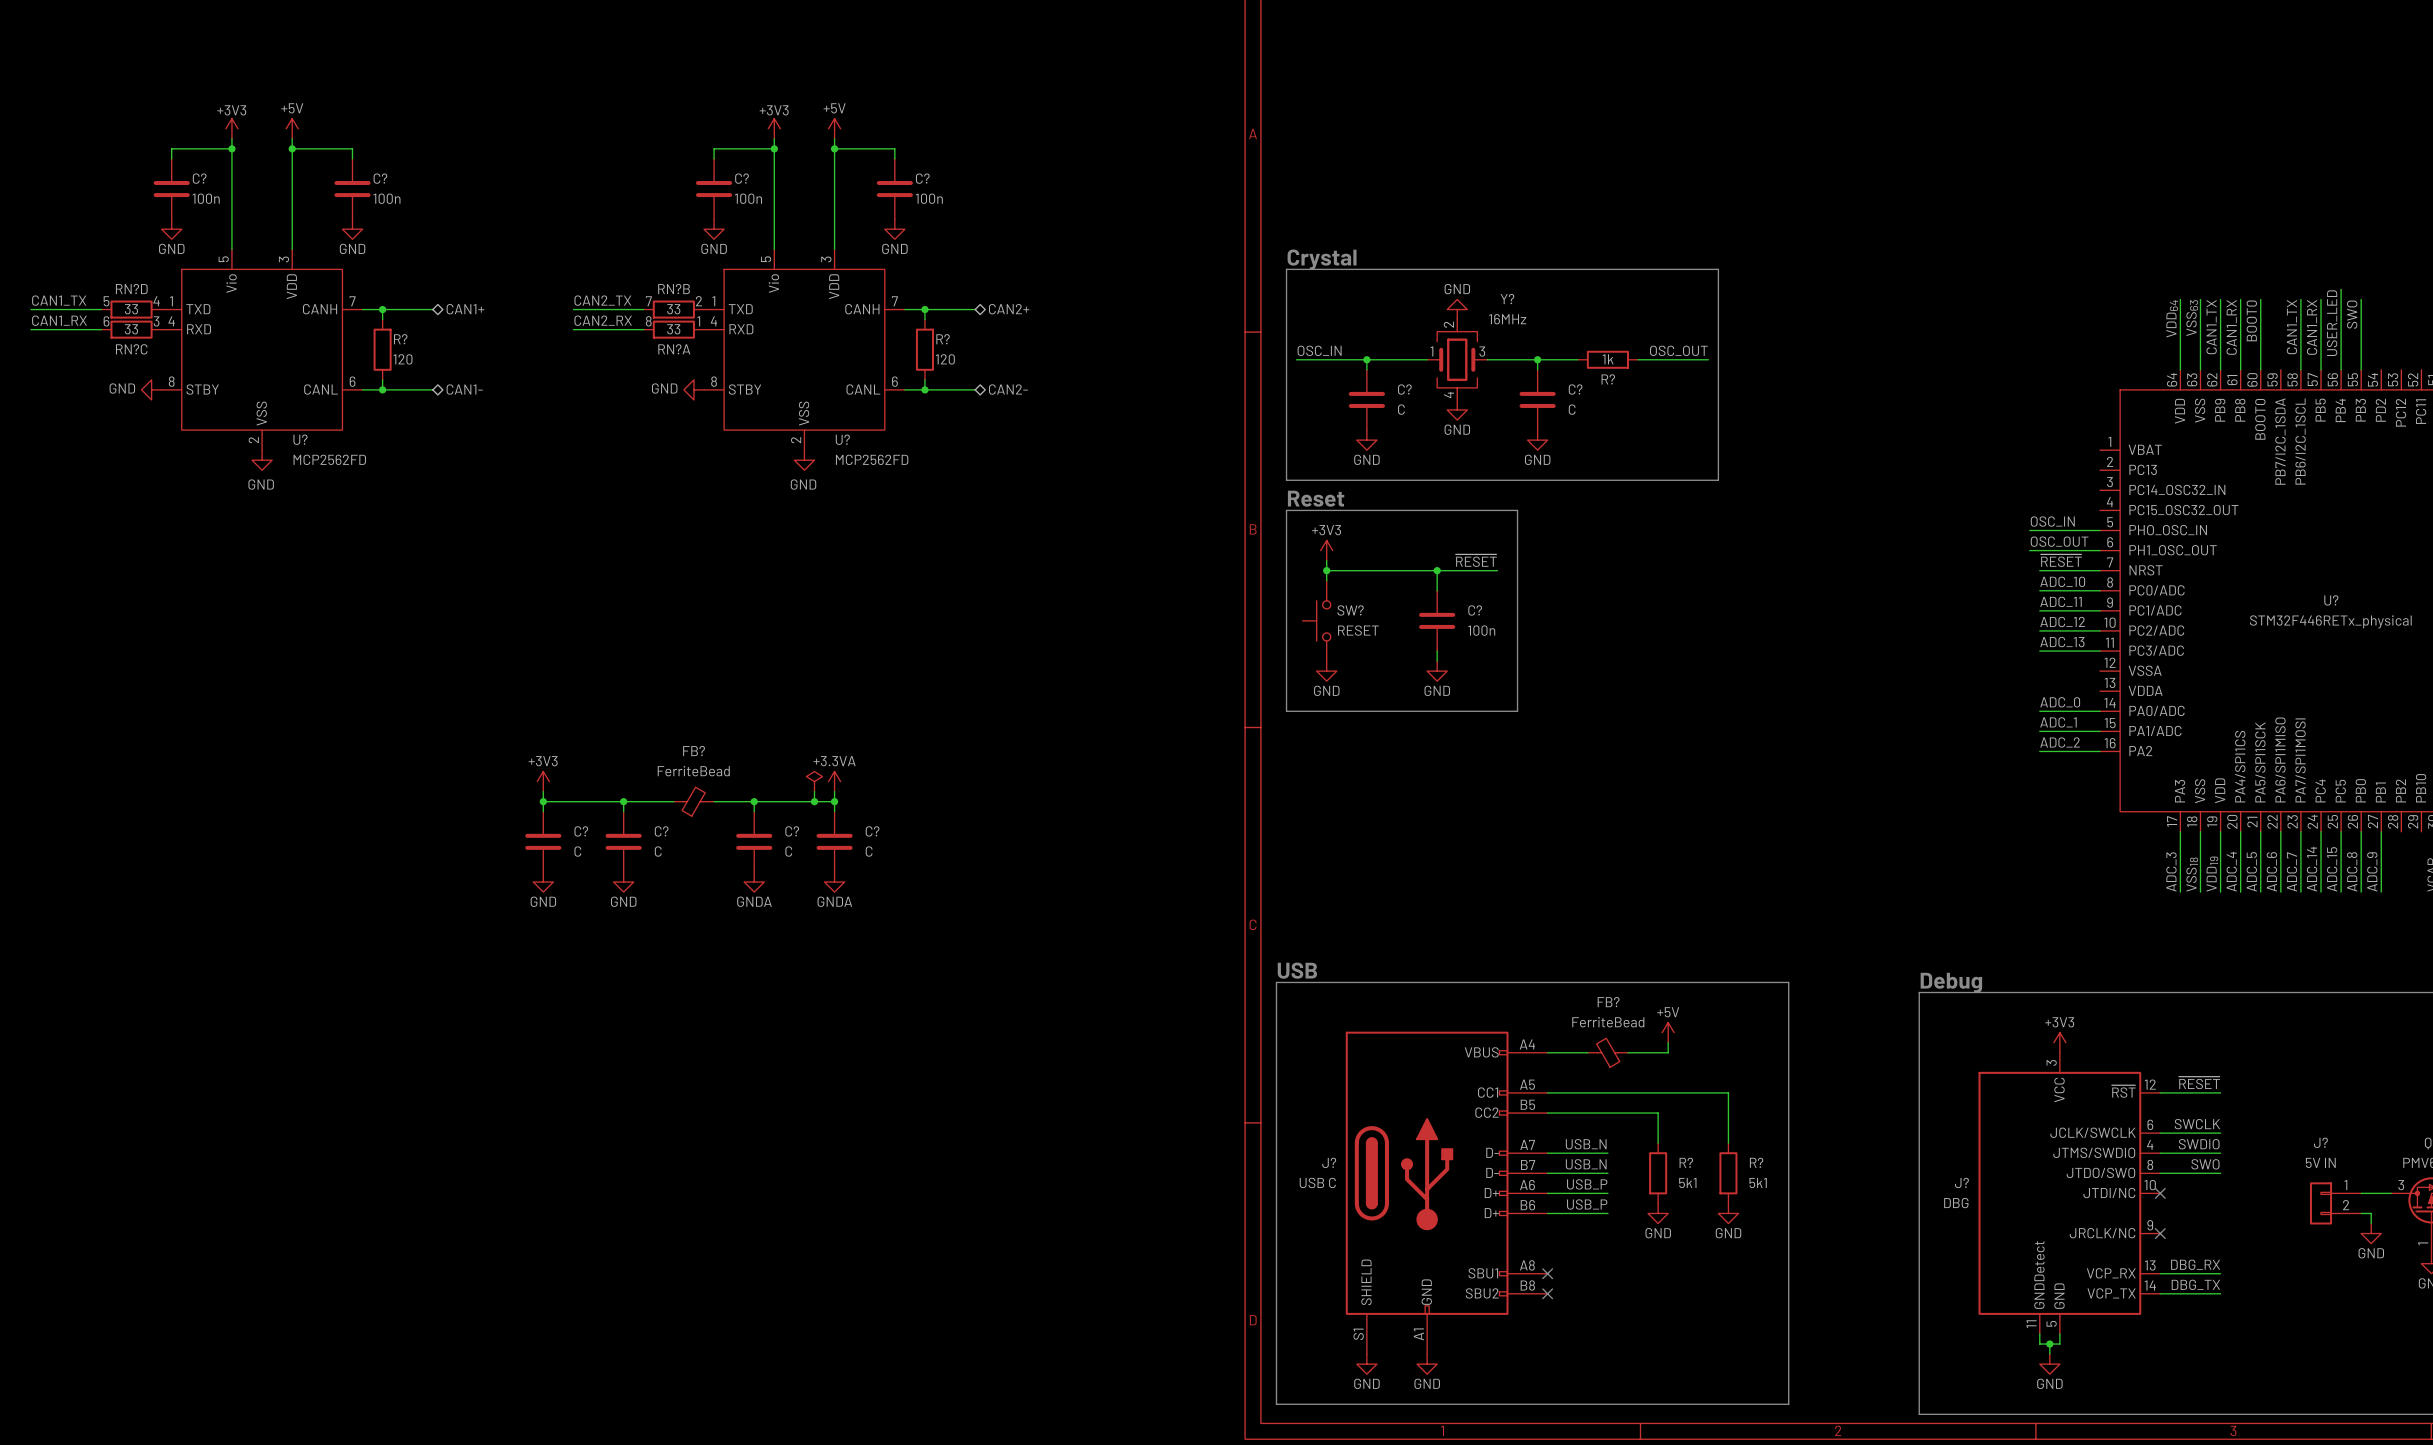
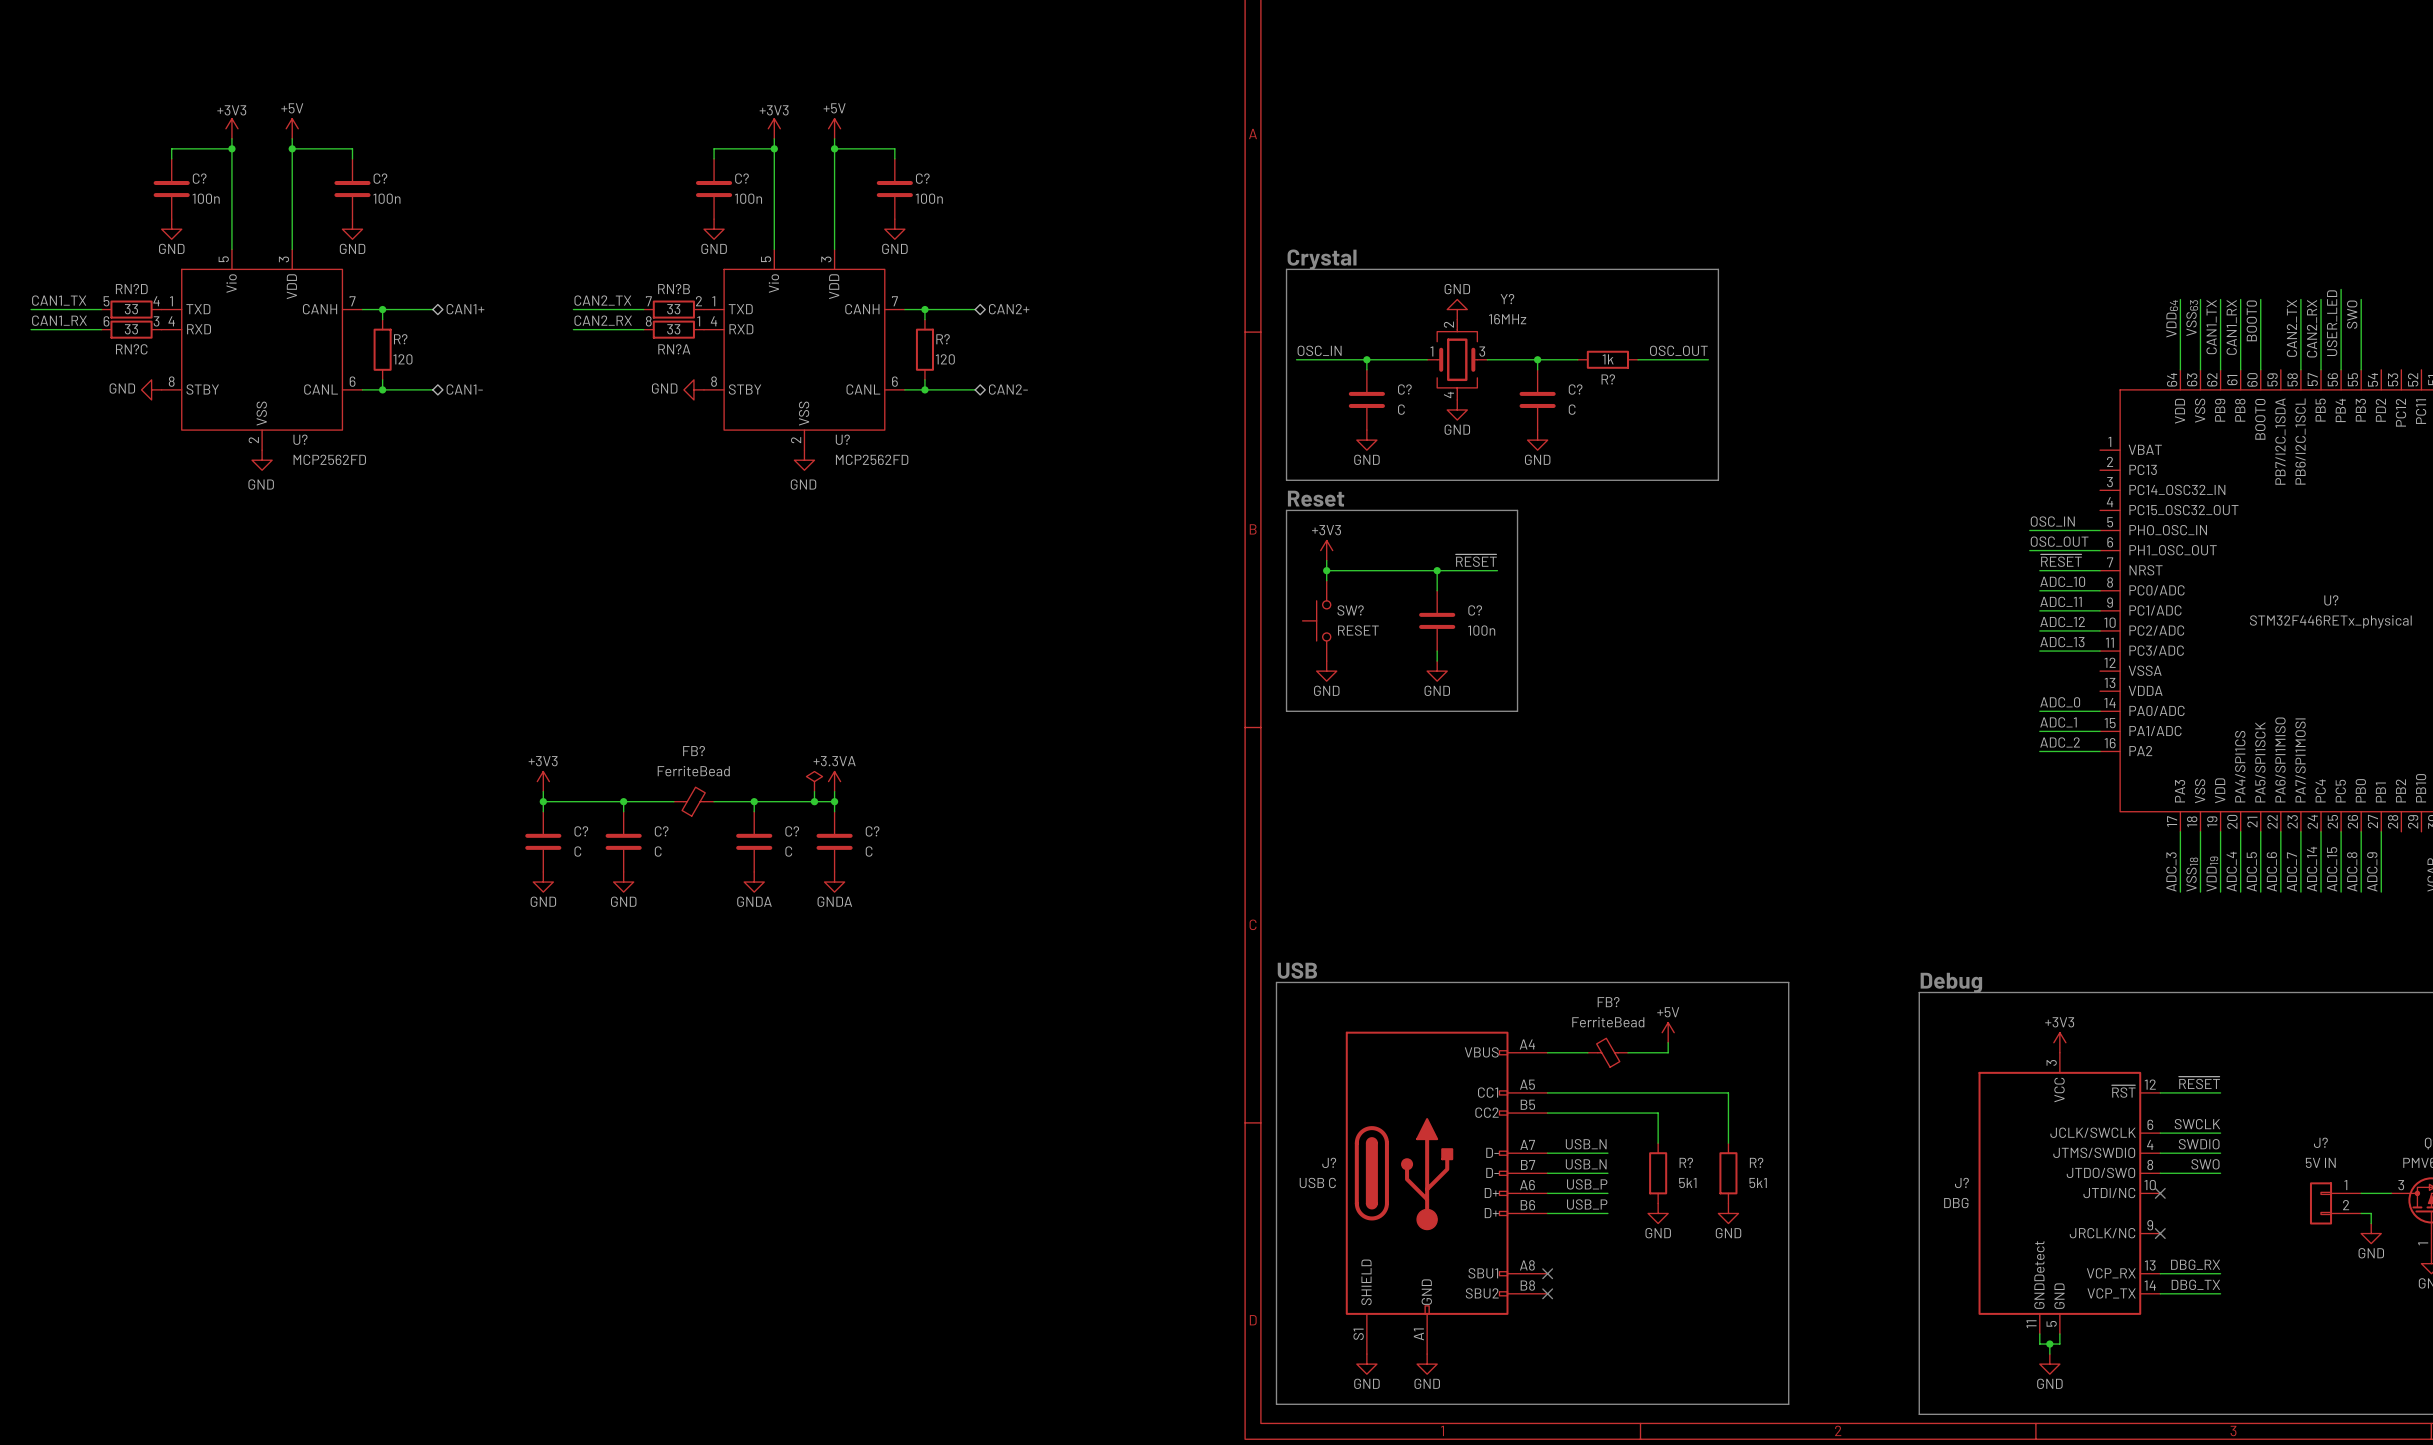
label: CAN1_TX (2291, 327) -> CAN2_TX (2291, 328)
label: CAN1_RX (2312, 327) -> CAN2_RX (2312, 328)

